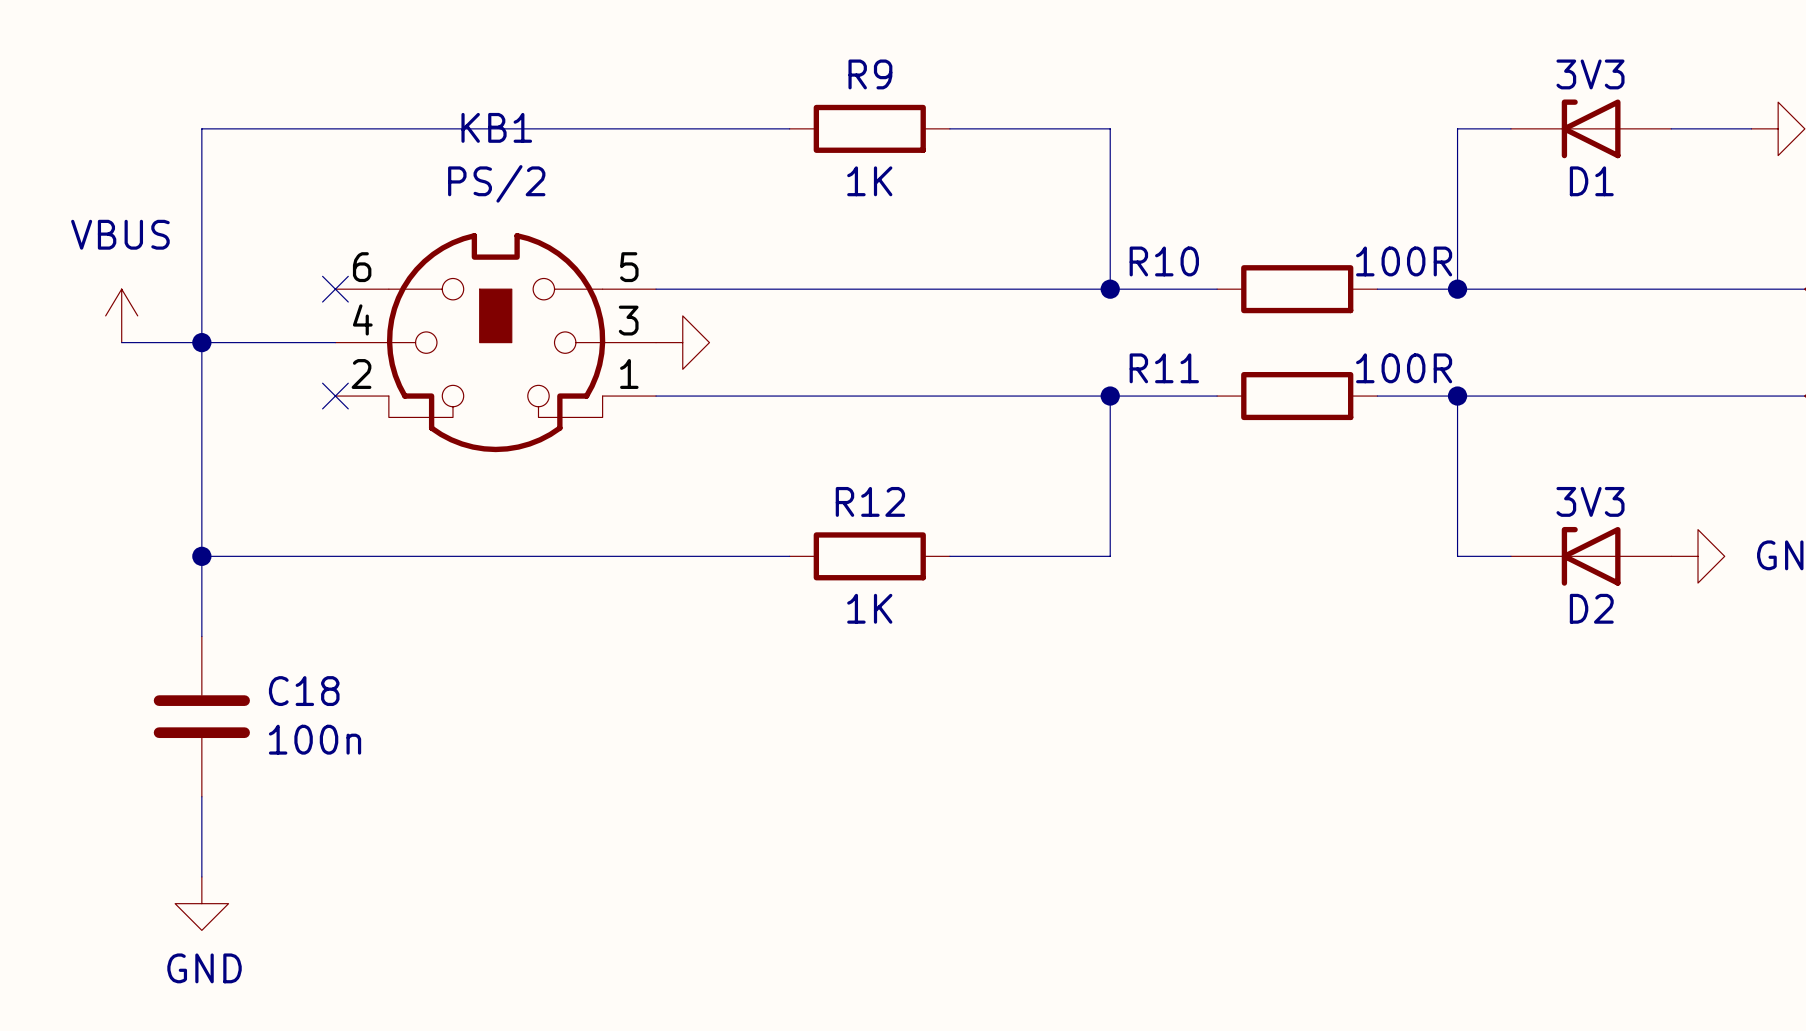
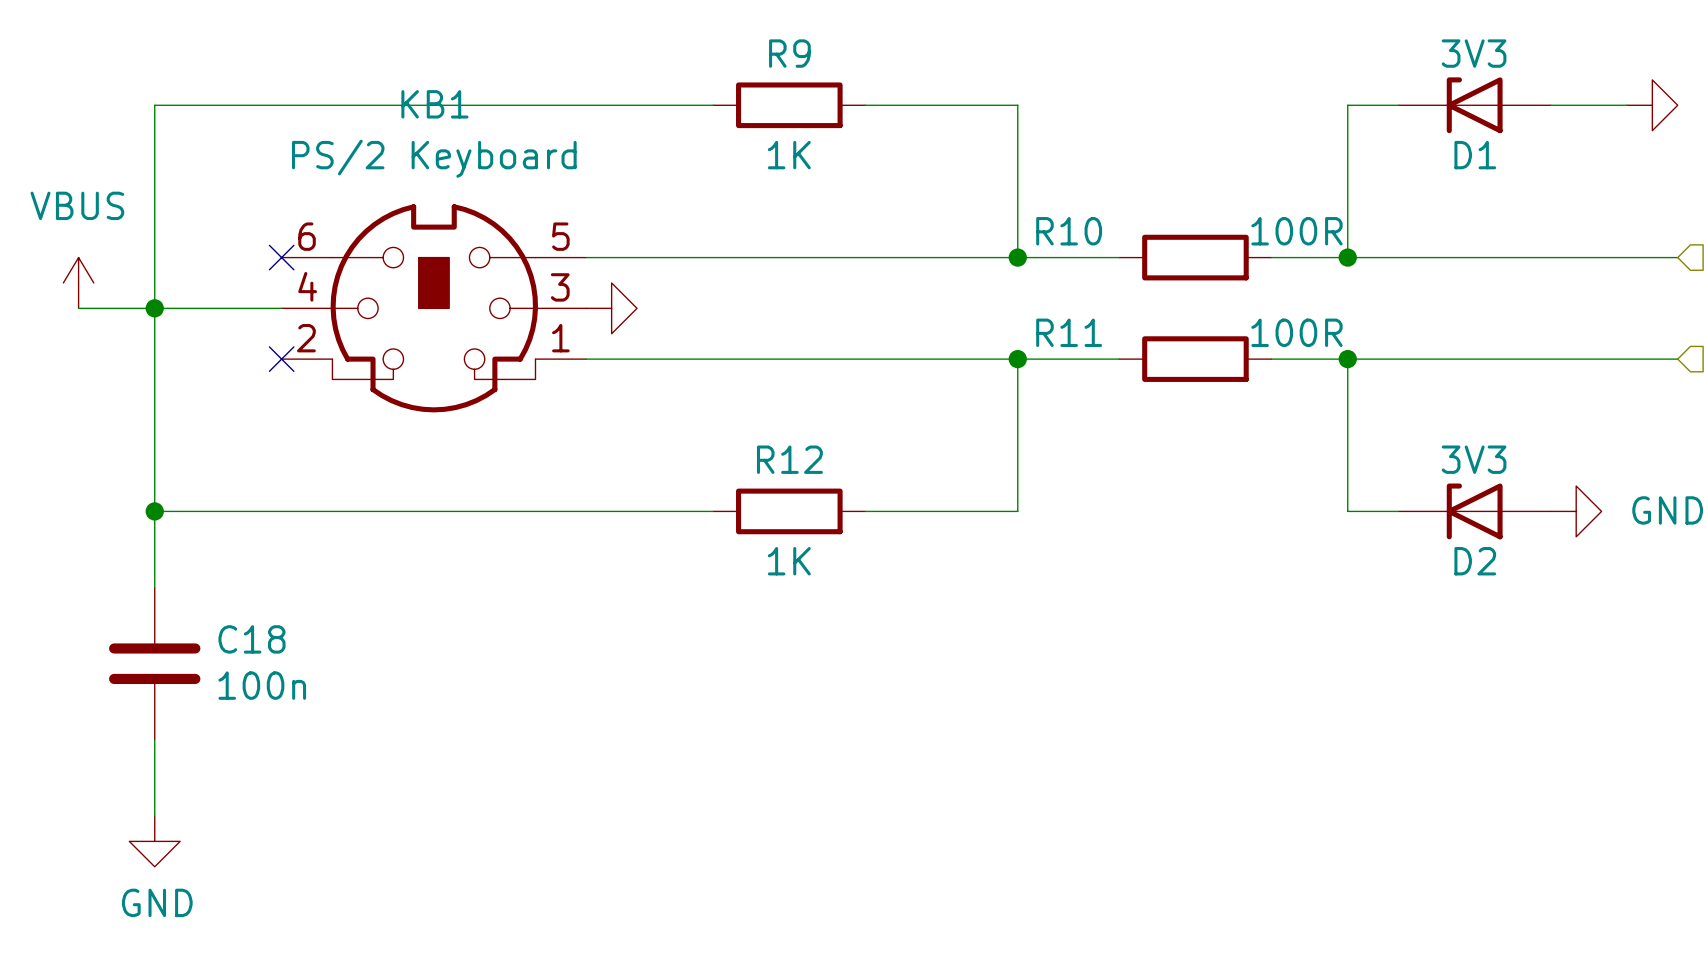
KB1 value: PS/2 (496, 183) -> PS/2 Keyboard (434, 158)

